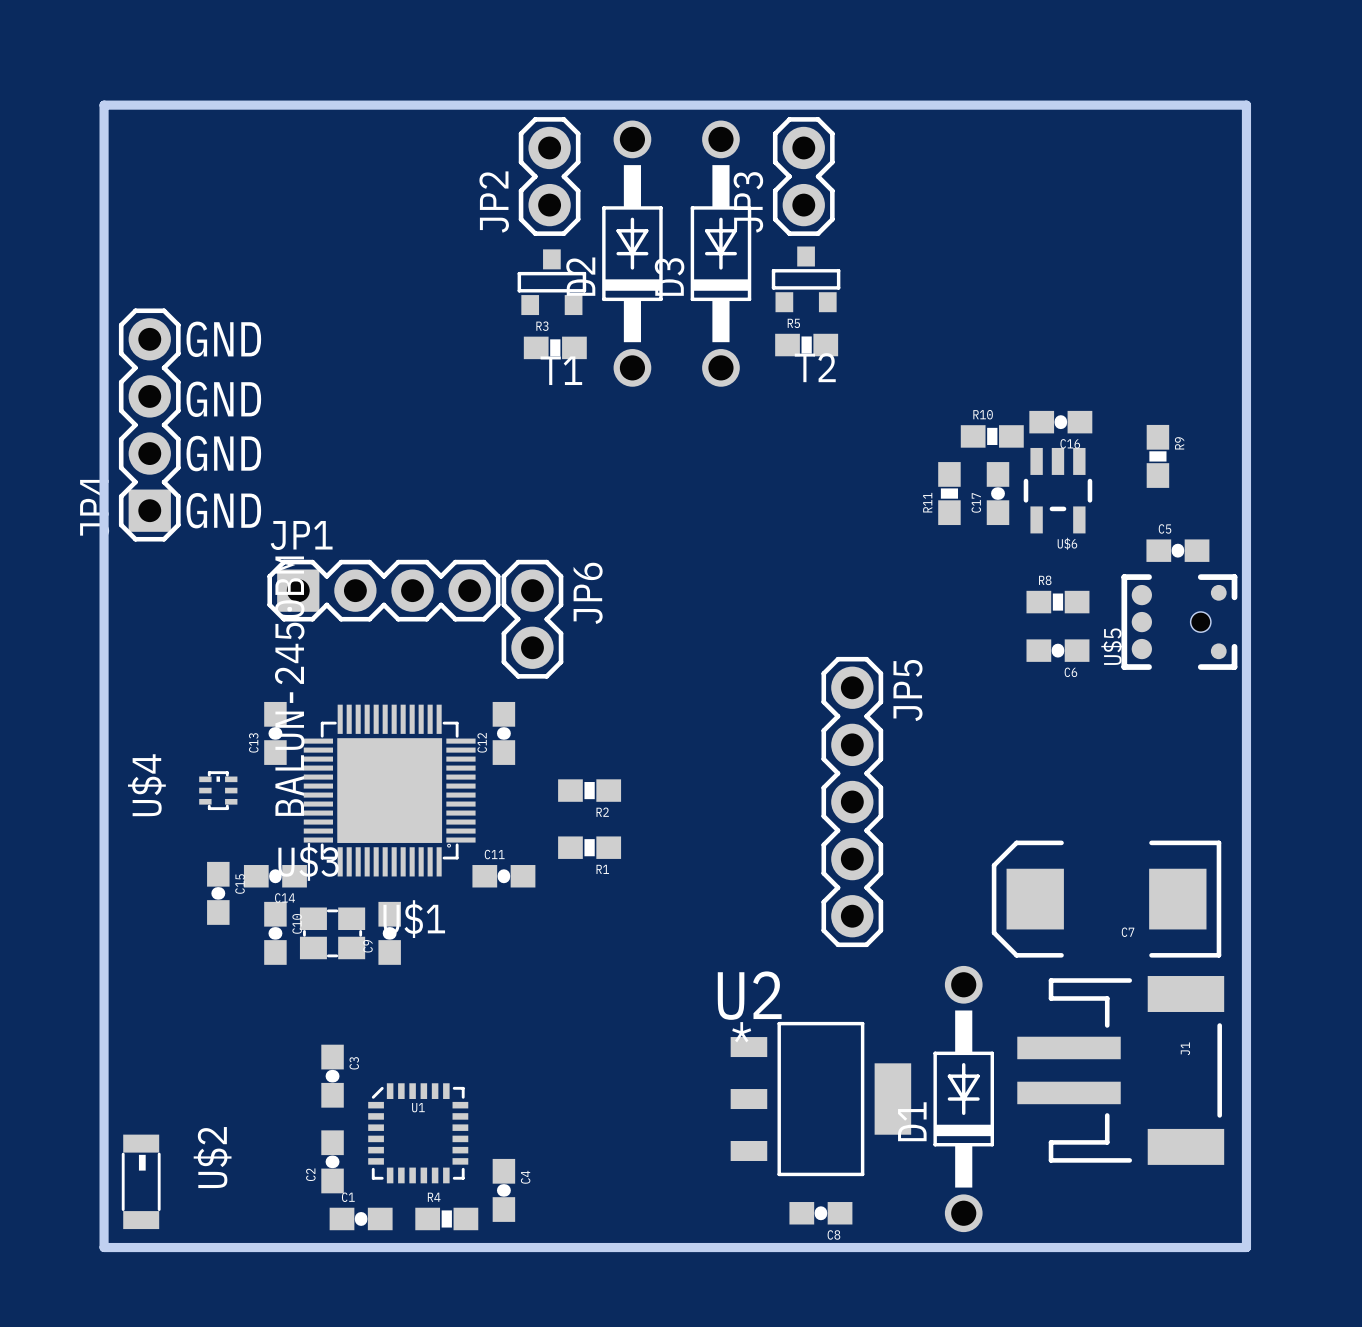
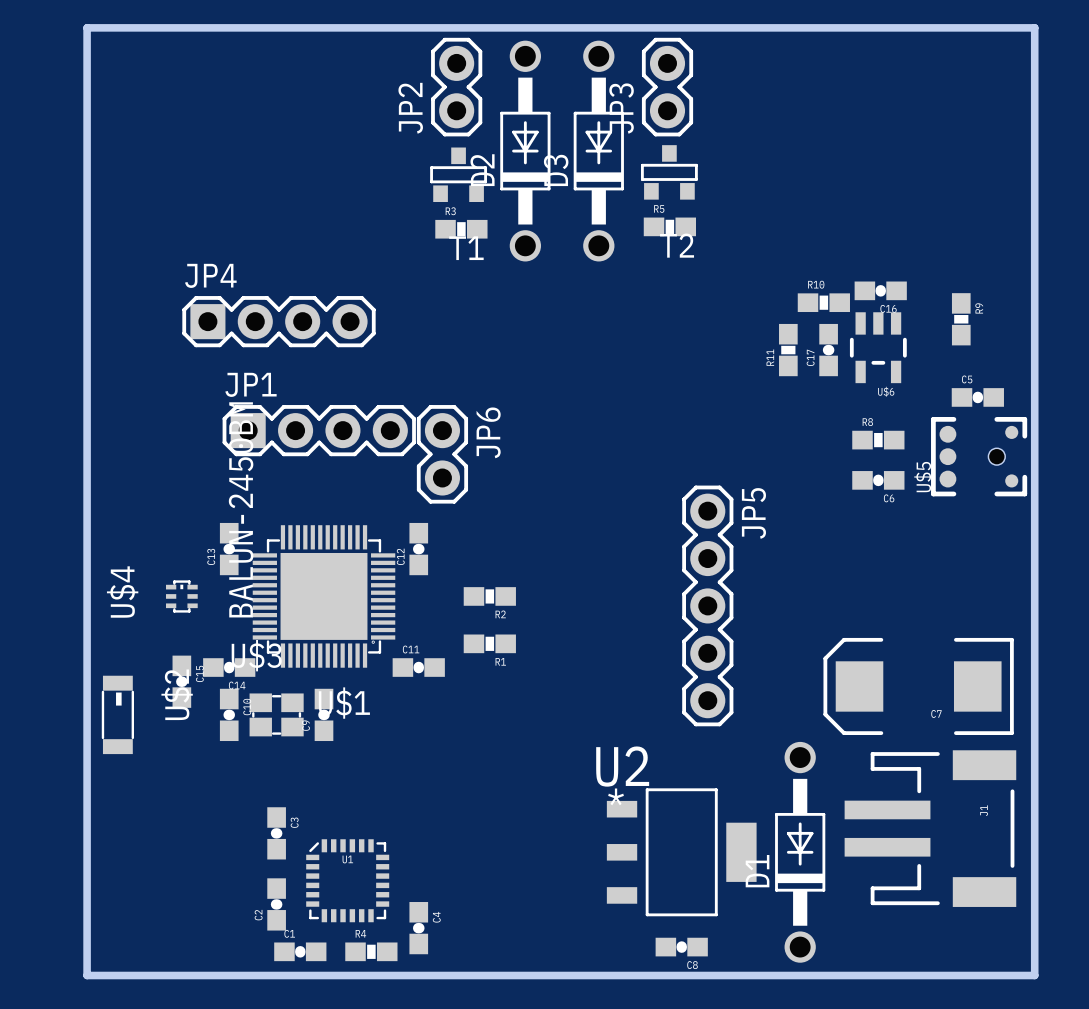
text: GND (223, 339) -> none
text: GND (223, 399) -> none
JP4 rotation: 0° (149, 425) -> 90° clockwise (278, 321)
JP4 position: (149, 425) -> (278, 321)
text: GND (223, 453) -> none
text: GND (223, 510) -> none
U$2 position: (141, 1181) -> (117, 714)

